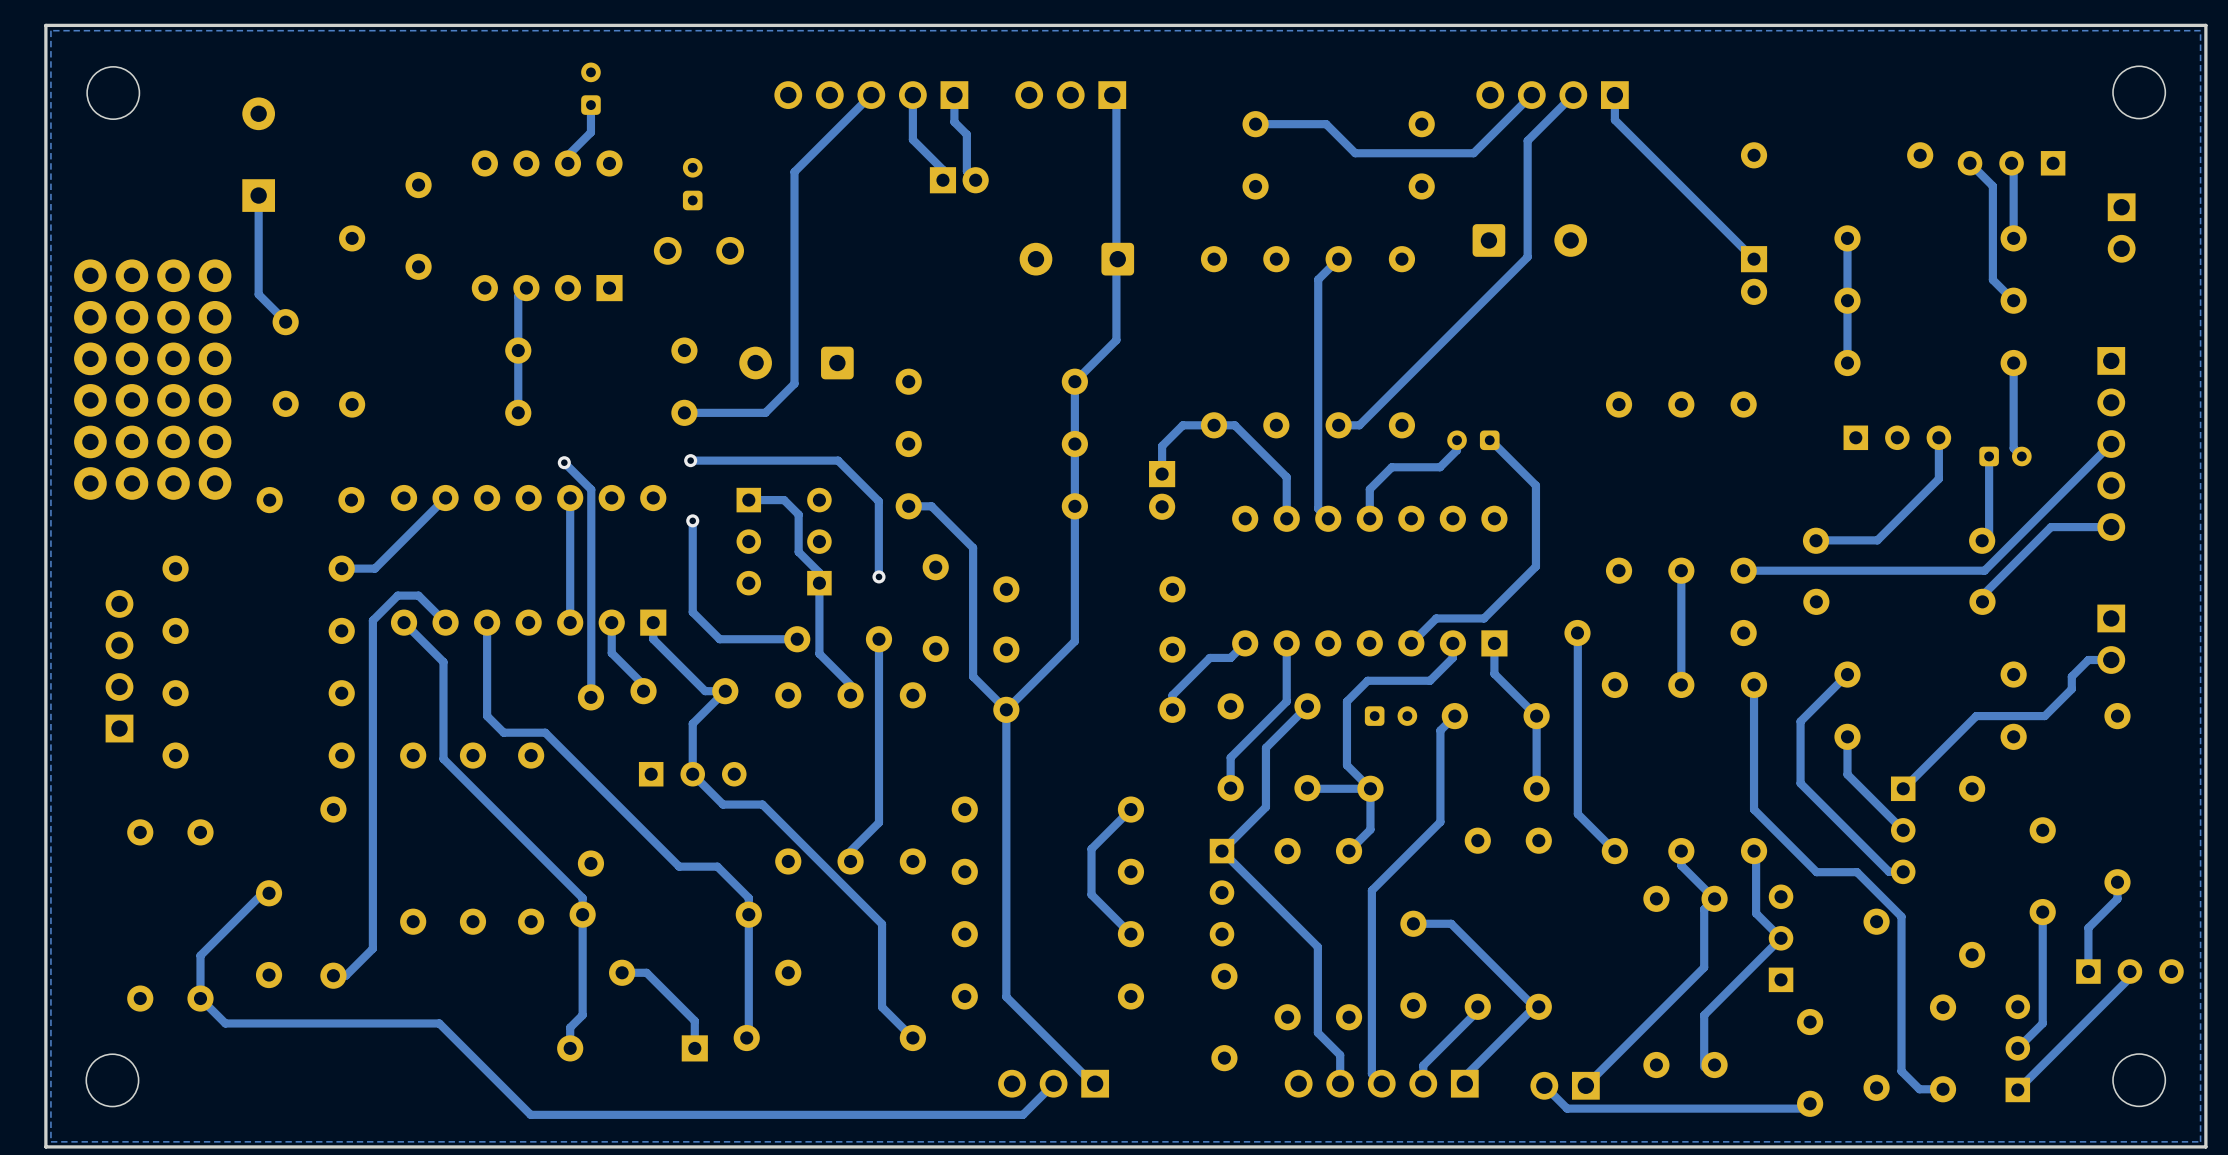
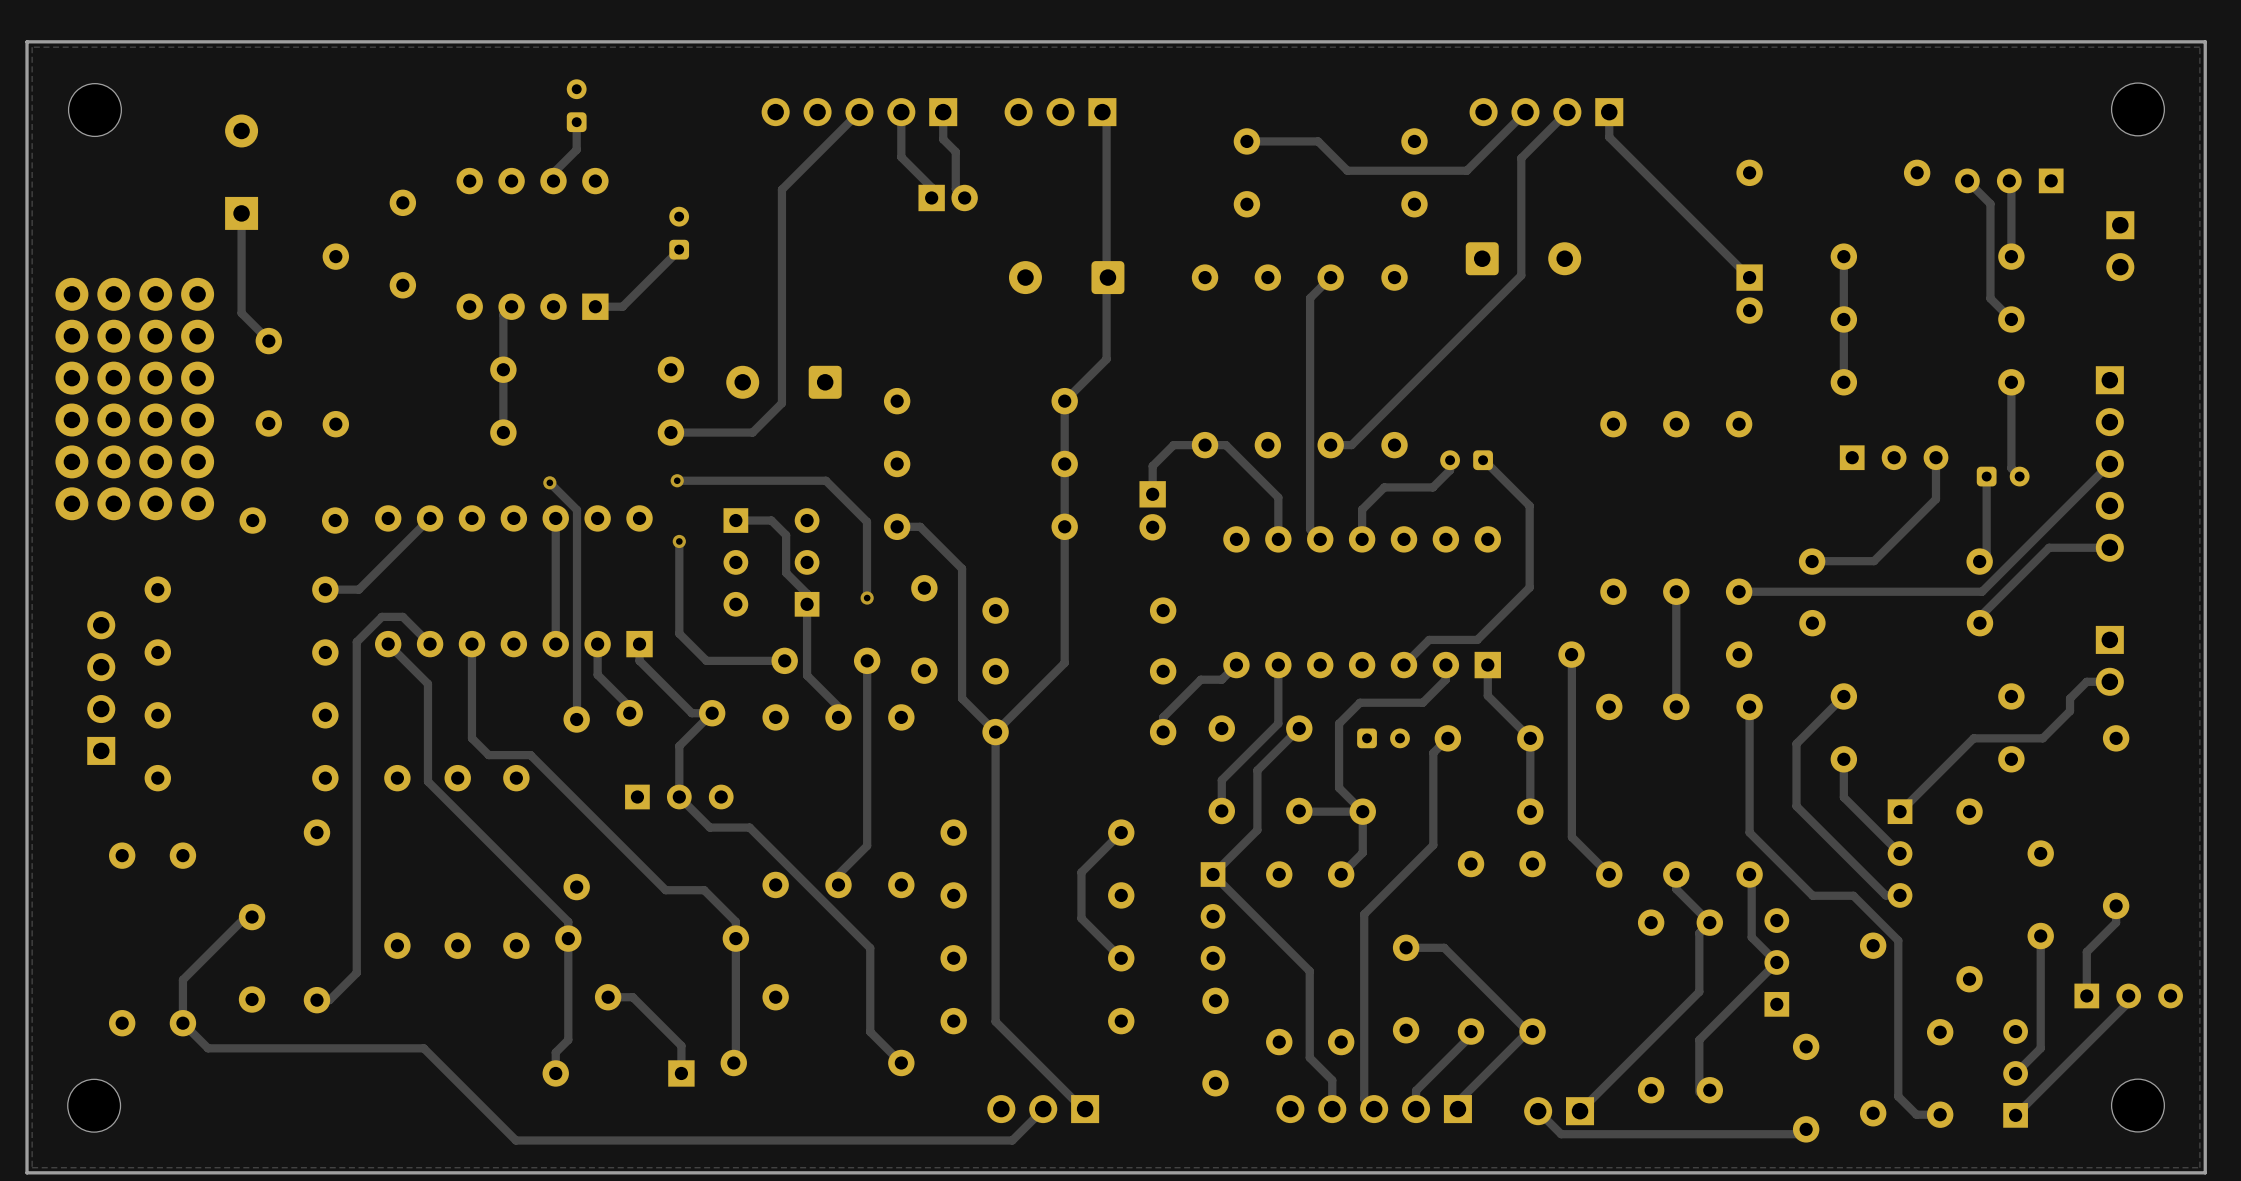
part position: (692, 184) -> (679, 233)
track: none -> (679, 250) (622, 306) (595, 306)
part: (667, 250) -> none
part: (730, 250) -> none

